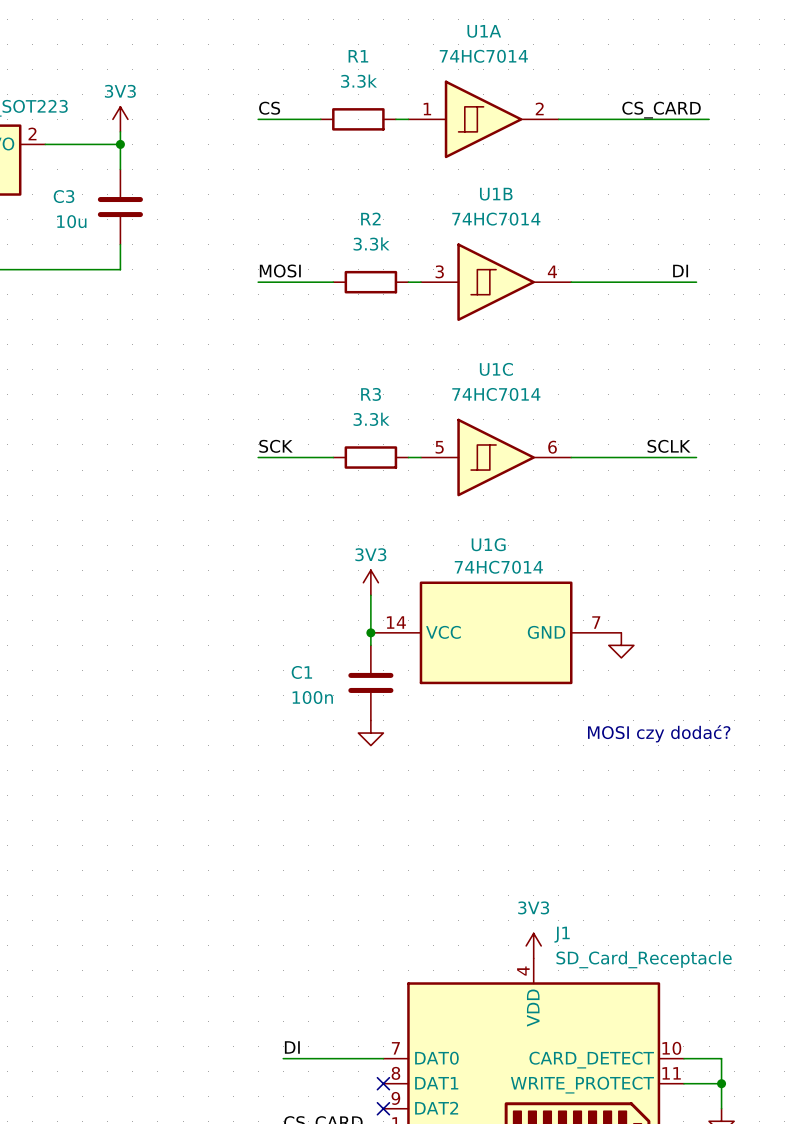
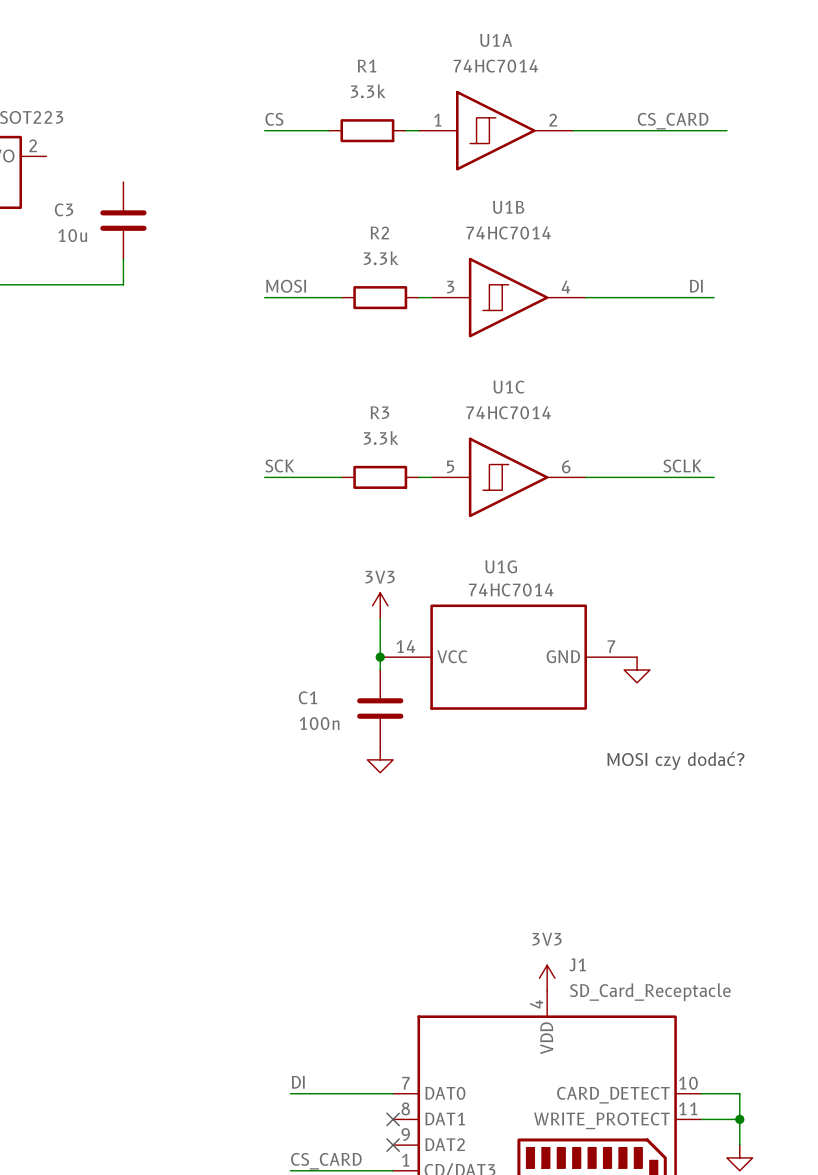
power symbol: 3V3 (120, 119) -> none
wire: (120, 131) (120, 169) -> none
wire: (45, 144) (120, 144) -> none
junction: (120, 144) -> none

